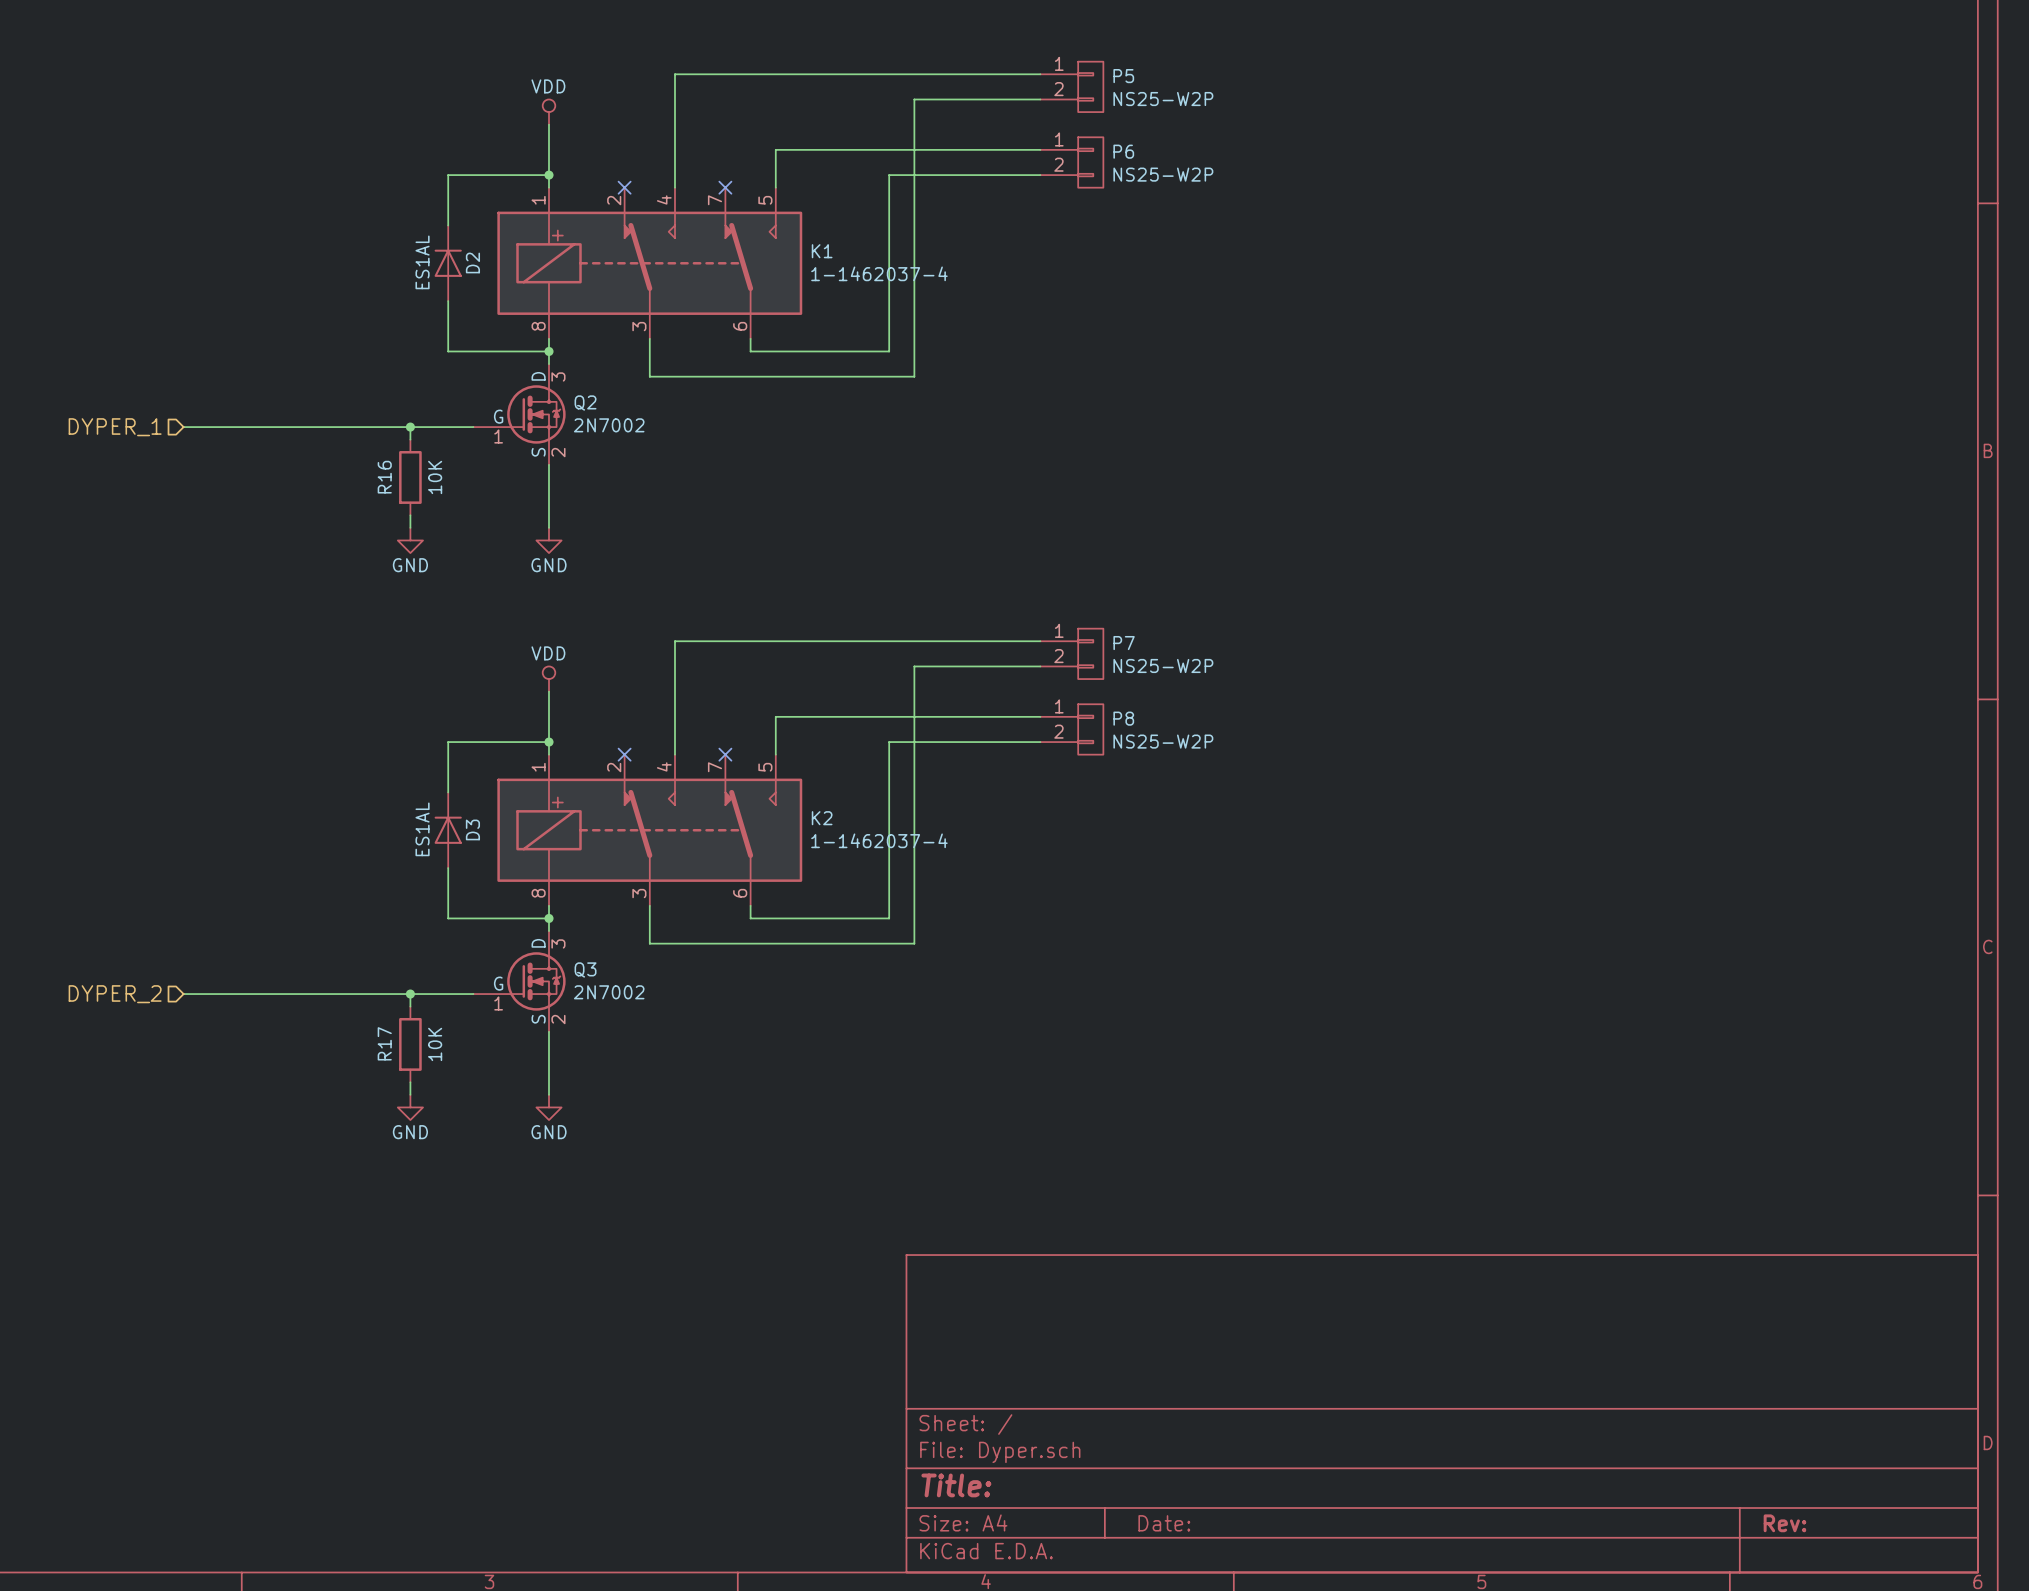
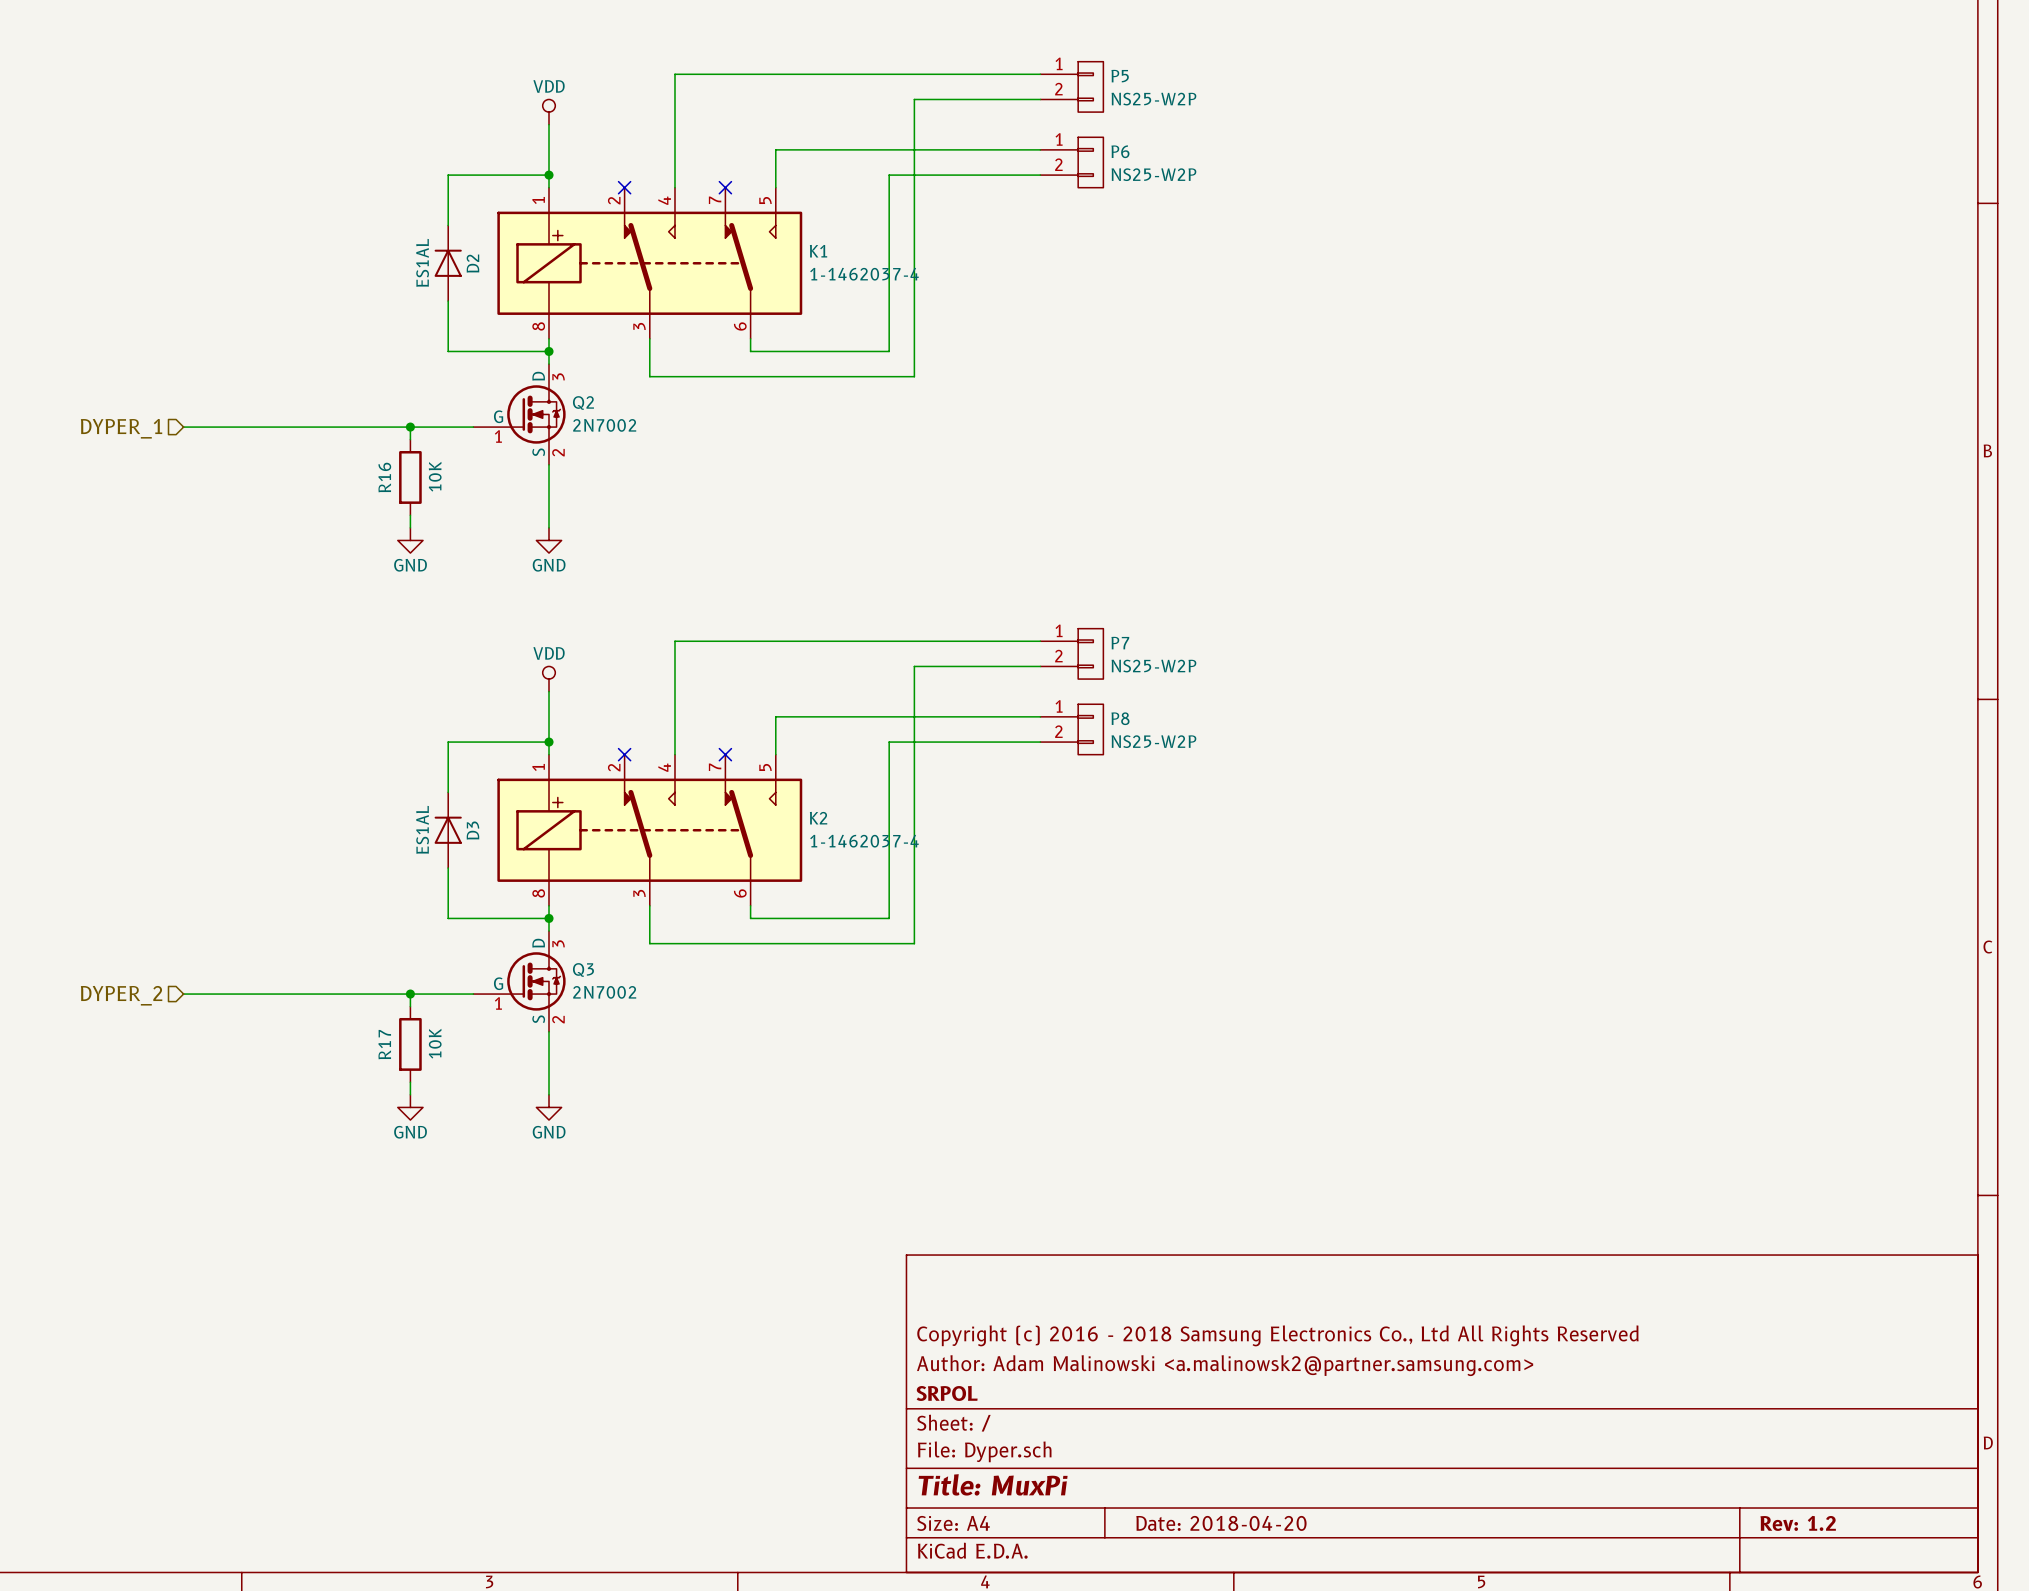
title block: none -> Copyright (c) 2016 - 2018 Samsung Electronics Co., Ltd All Rights Reserved (1277, 1335)
title block: none -> Author: Adam Malinowski <a.malinowsk2@partner.samsung.com> (1225, 1365)
title block: none -> SRPOL (947, 1393)
title block: Title: (956, 1485) -> Title: MuxPi (993, 1484)
title block: Date: (1164, 1523) -> Date: 2018-04-20 (1221, 1523)
title block: Rev: (1784, 1523) -> Rev: 1.2 (1798, 1523)

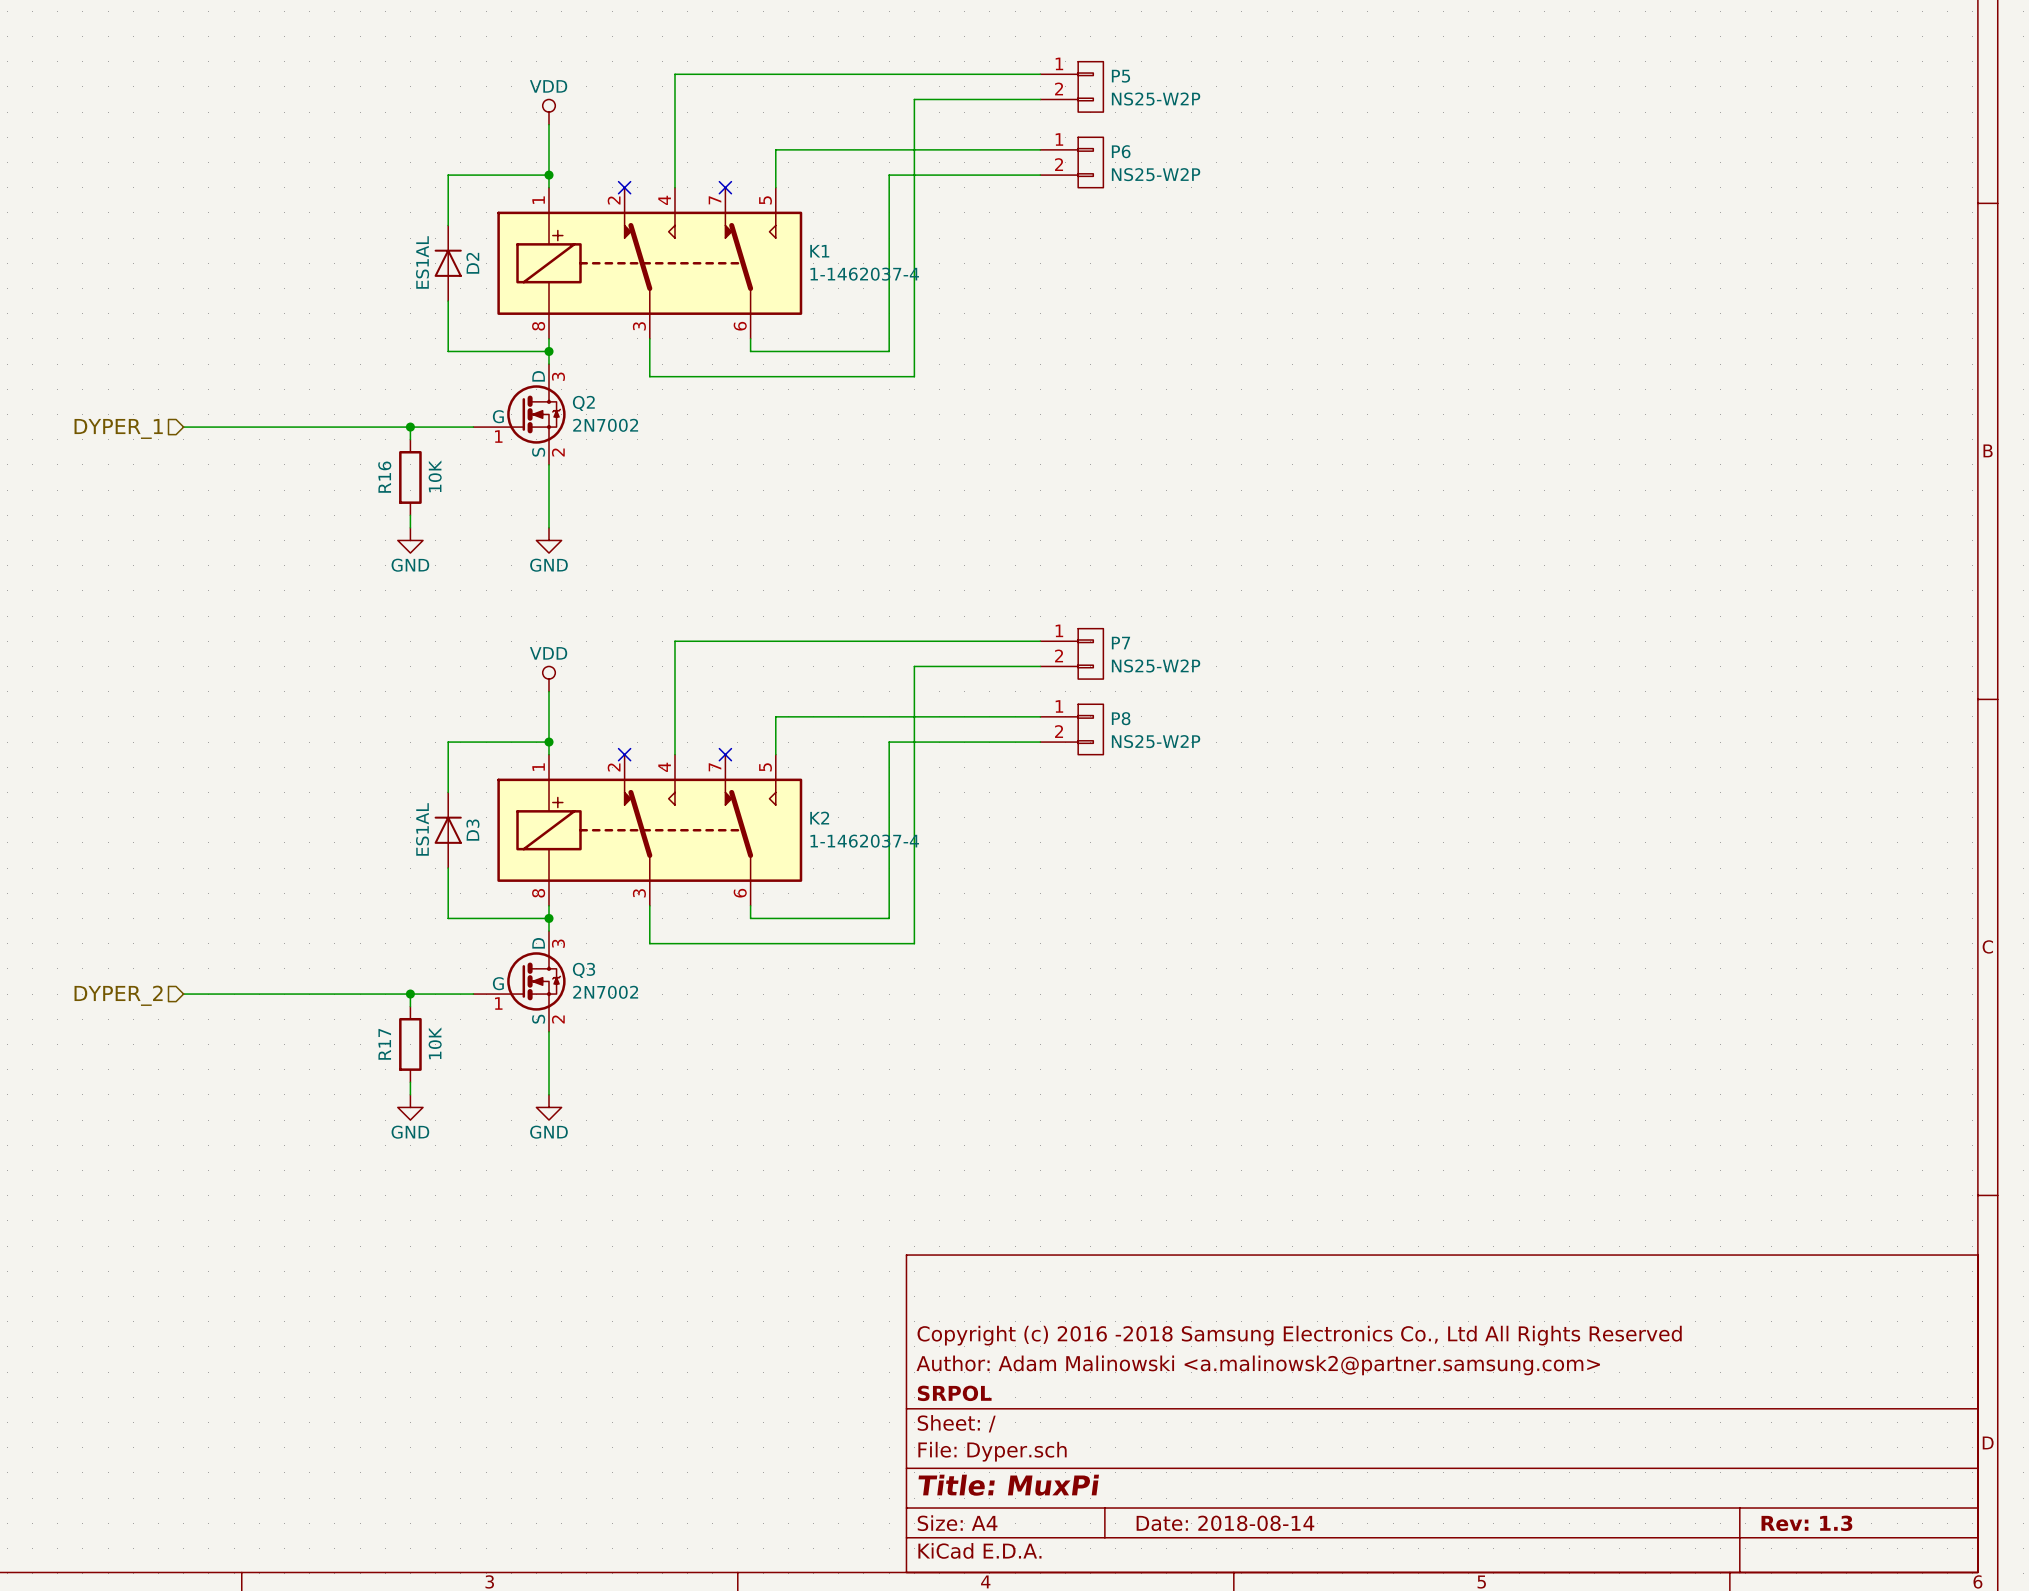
title block: Copyright (c) 2016 - 2018 Samsung Electronics Co., Ltd All Rights Reserved (1277, 1335) -> Copyright (c) 2016 -2018 Samsung Electronics Co., Ltd All Rights Reserved (1299, 1335)
title block: Date: 2018-04-20 (1221, 1523) -> Date: 2018-08-14 (1225, 1523)
title block: Rev: 1.2 (1798, 1523) -> Rev: 1.3 (1806, 1523)

